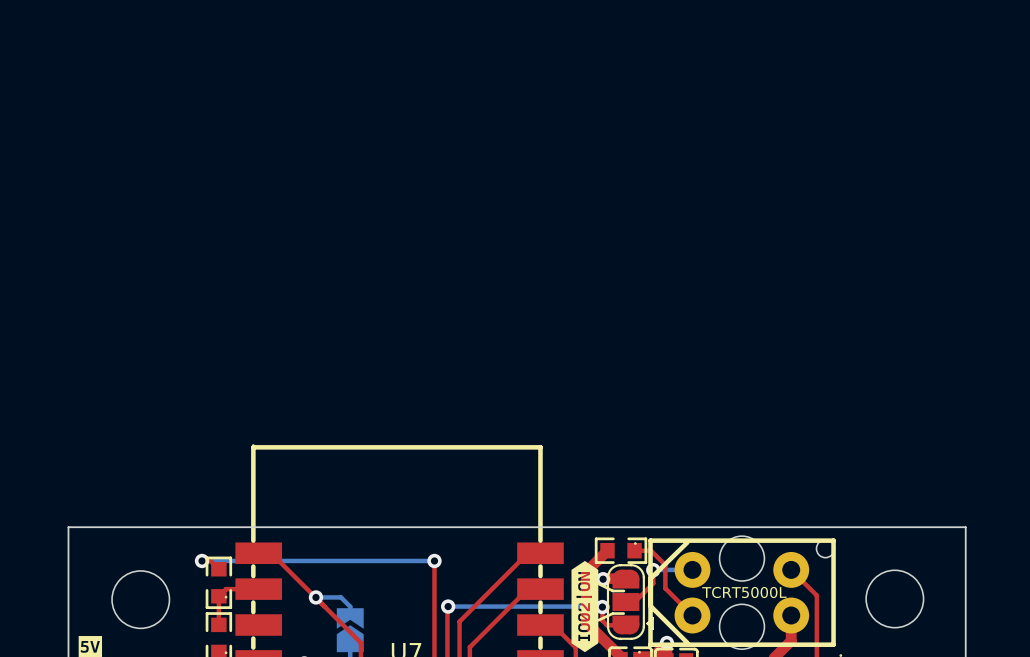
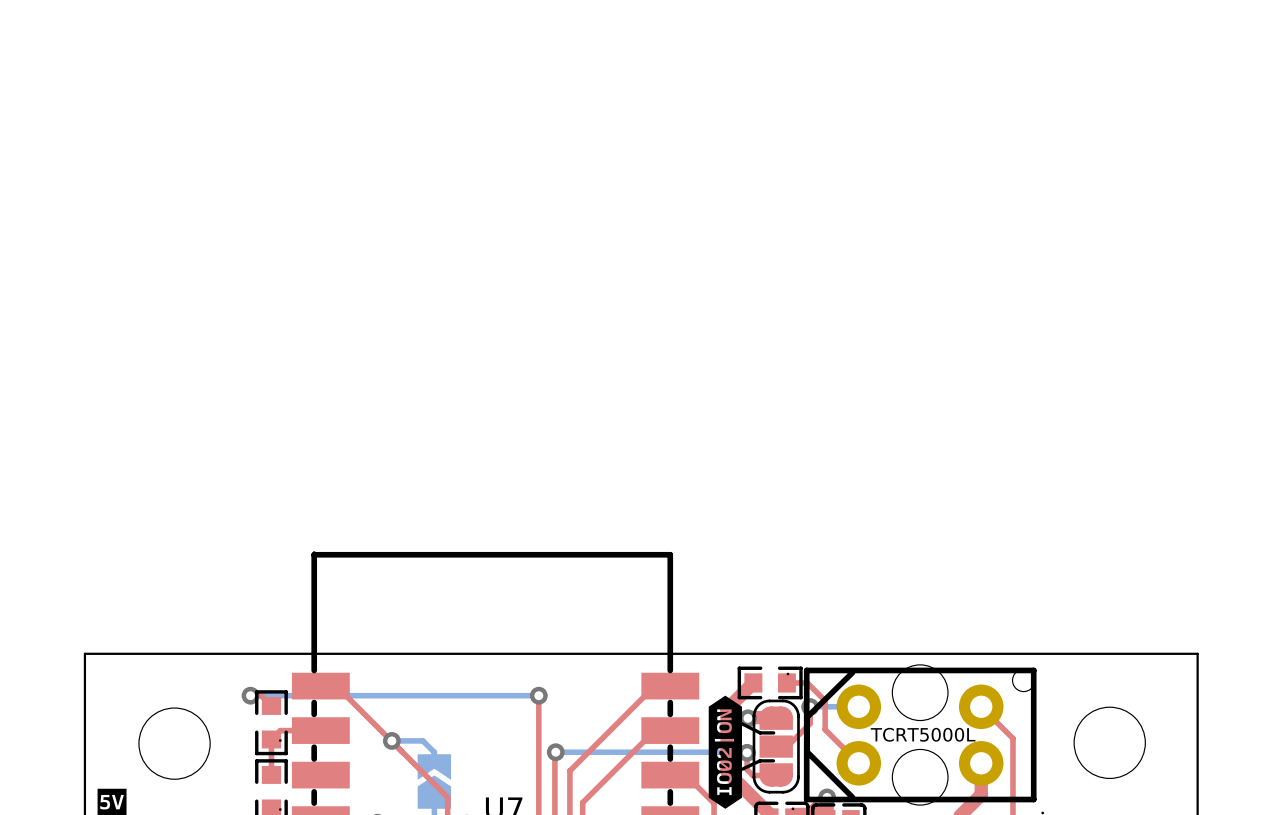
part footprint: [606, 564, 654, 640] -> [752, 699, 800, 794]

